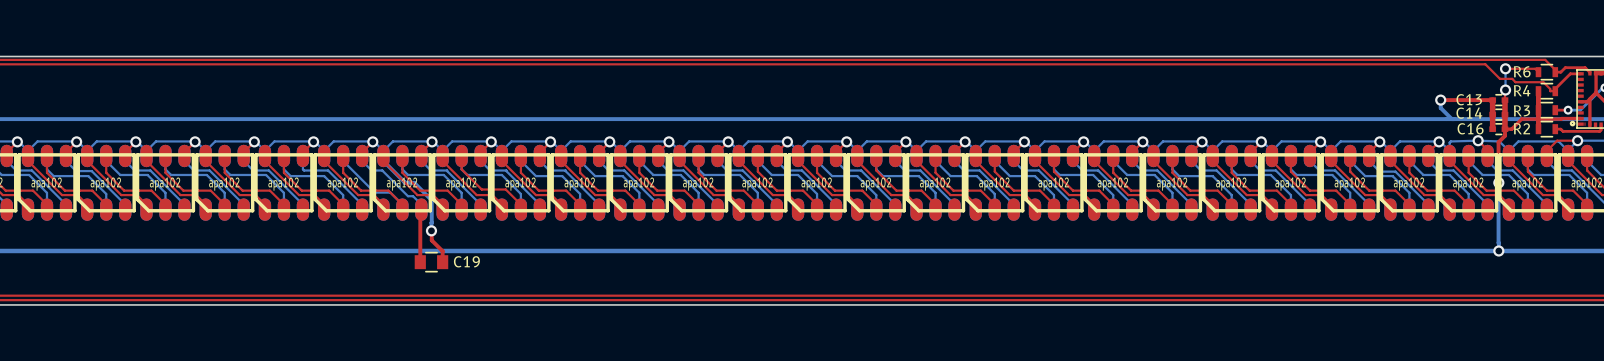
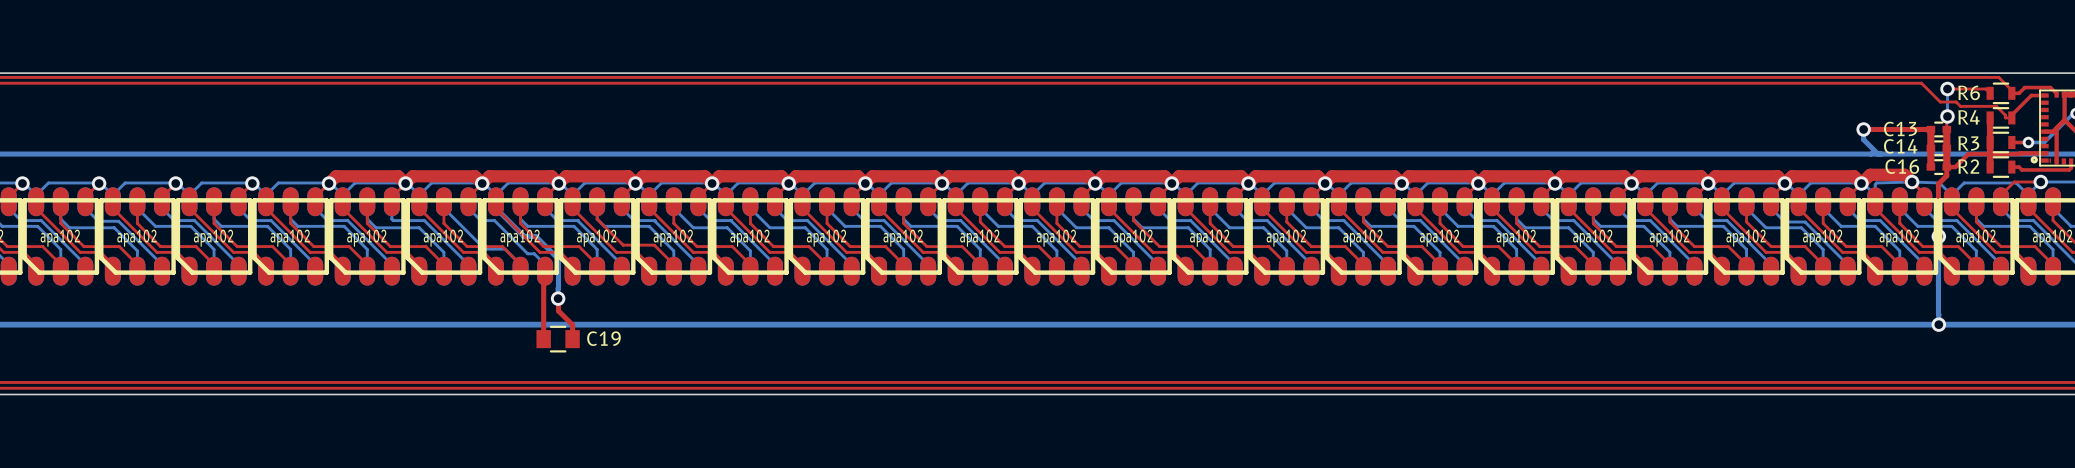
top track: none -> (1912, 182) (1904, 174) (1870, 174) (1861, 183) (1854, 176) (1792, 176) (1784, 183) (1777, 176) (1715, 176) (1708, 183) (1701, 176) (1638, 176) (1631, 183) (1624, 176) (1562, 176) (1554, 183) (1547, 176) (1485, 176) (1478, 183) (1471, 176) (1408, 176) (1401, 183) (1394, 176) (1332, 176) (1325, 183) (1317, 176) (1255, 176) (1248, 183) (1241, 176) (1179, 176) (1171, 183) (1164, 176) (1102, 176) (1095, 183) (1088, 176) (1025, 176) (1018, 183) (1011, 176) (949, 176) (941, 183) (934, 176) (872, 176) (865, 183) (858, 176) (795, 176) (788, 183) (781, 176) (719, 176) (712, 183) (704, 176) (642, 176) (635, 183) (628, 176) (566, 176) (558, 183) (551, 176) (489, 176) (482, 183) (475, 176) (412, 176) (405, 183) (398, 176) (336, 176) (328, 183)

